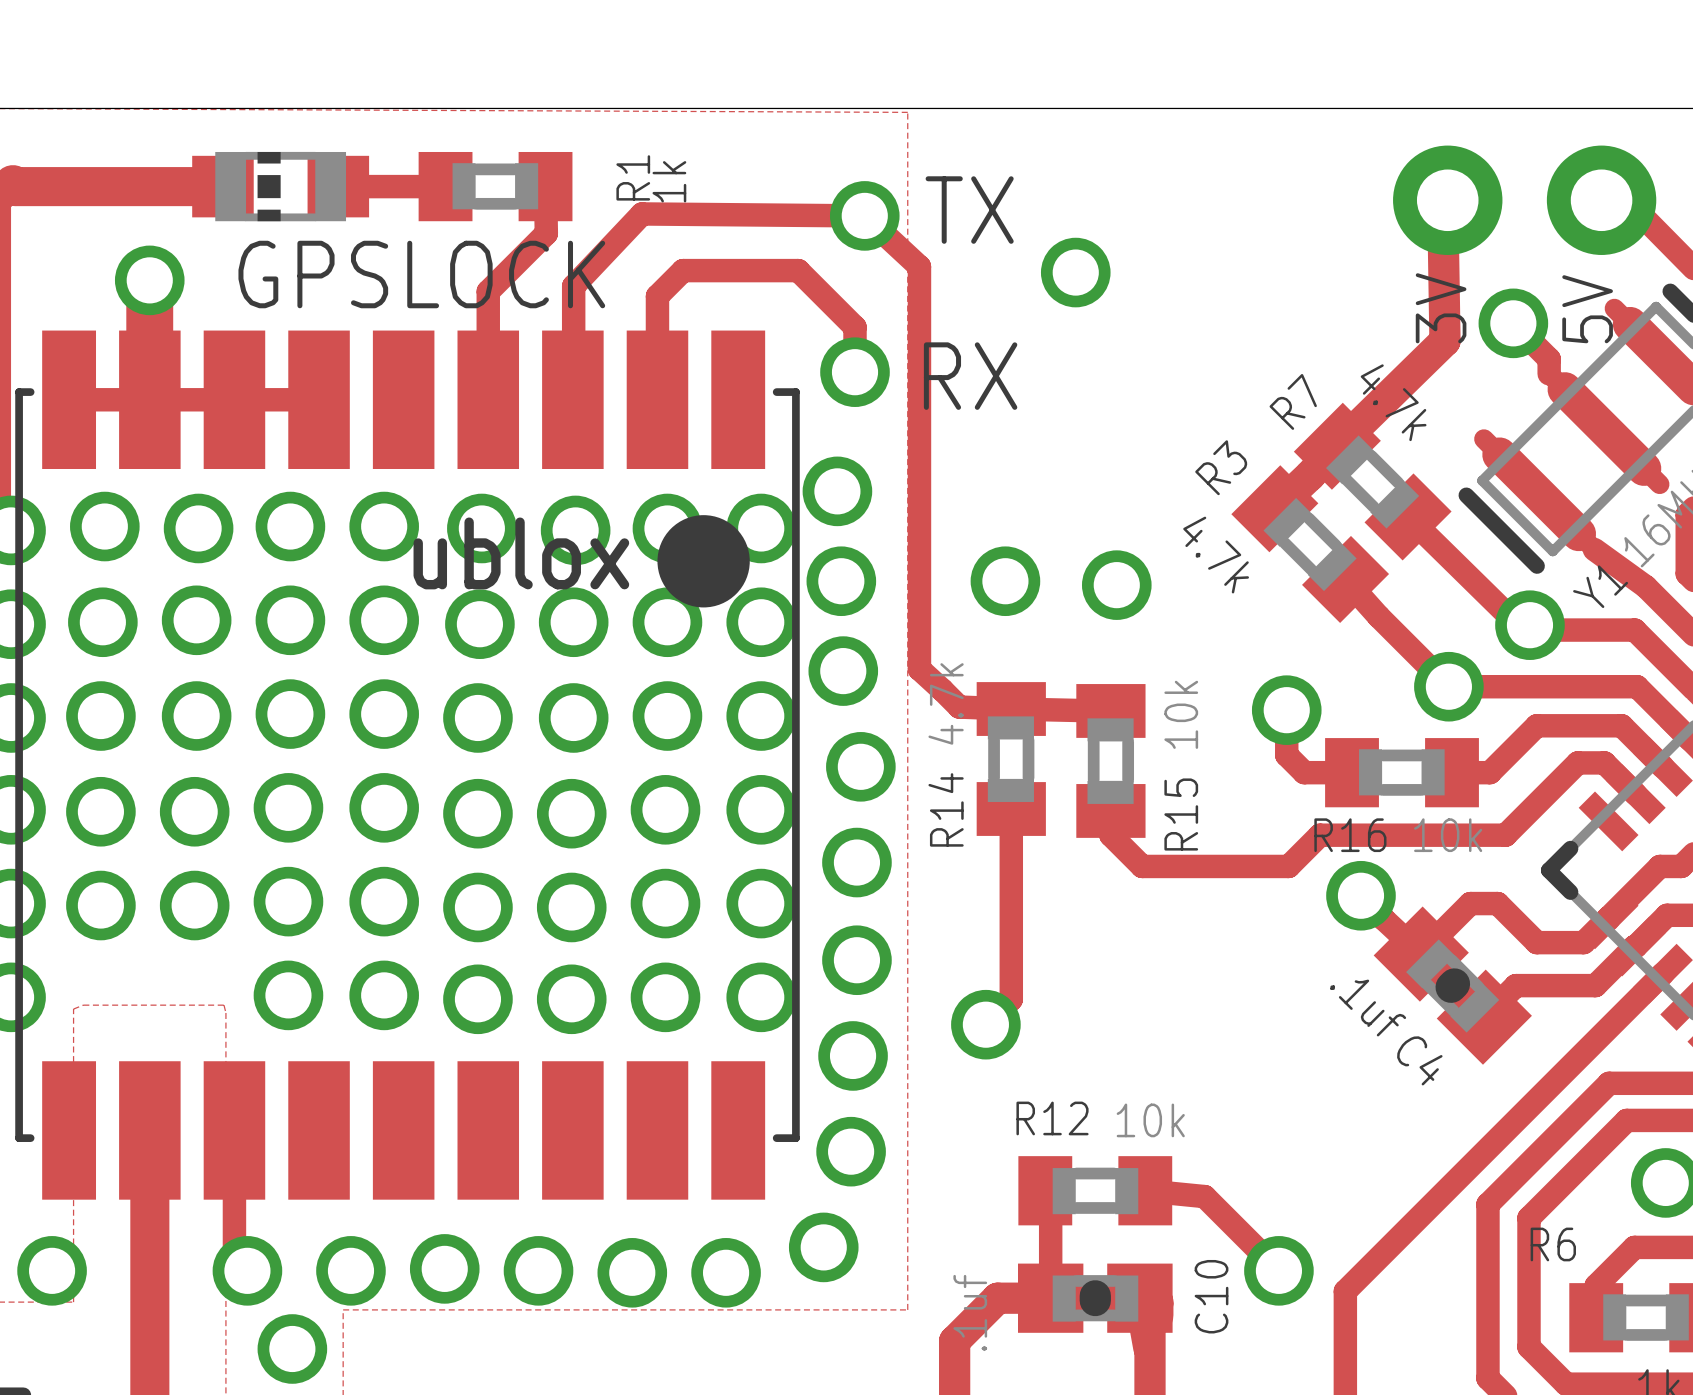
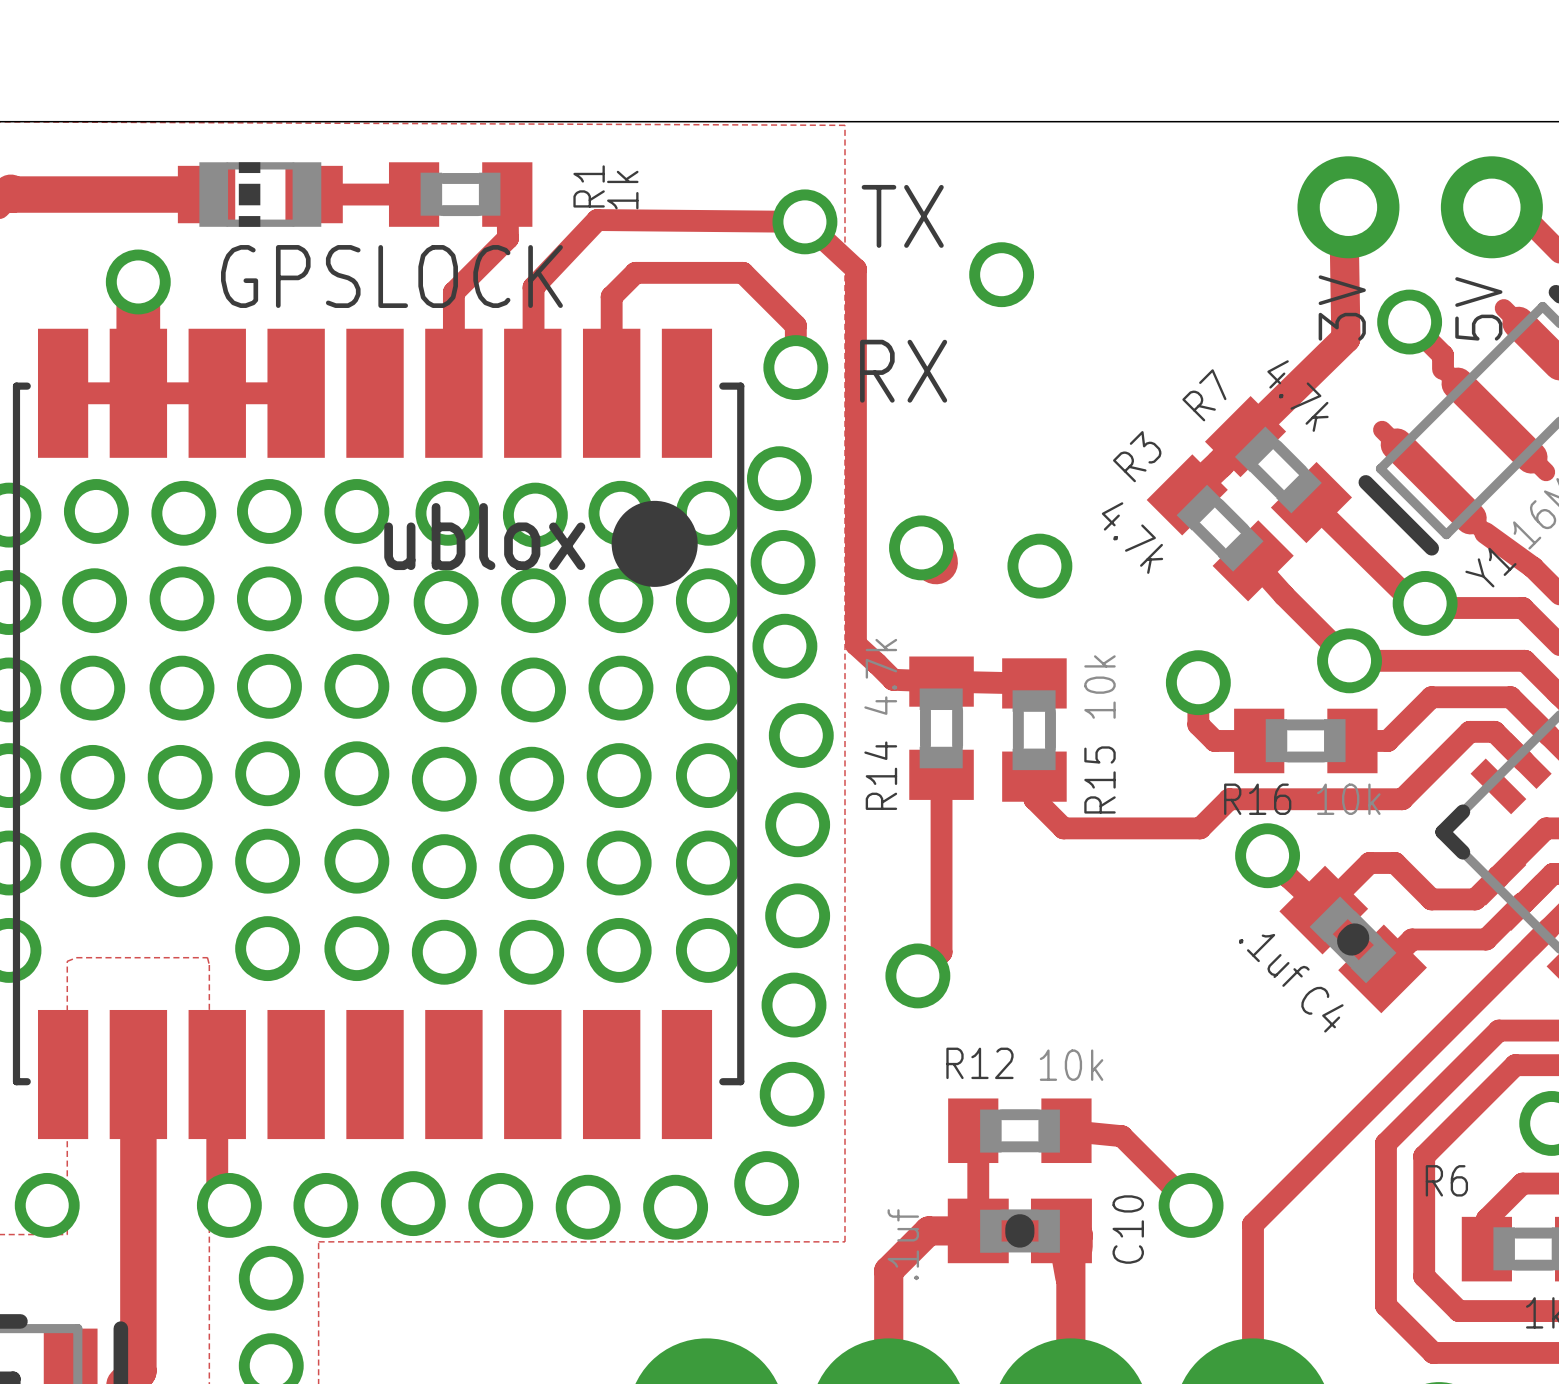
via position: (1005, 581) -> (921, 547)

